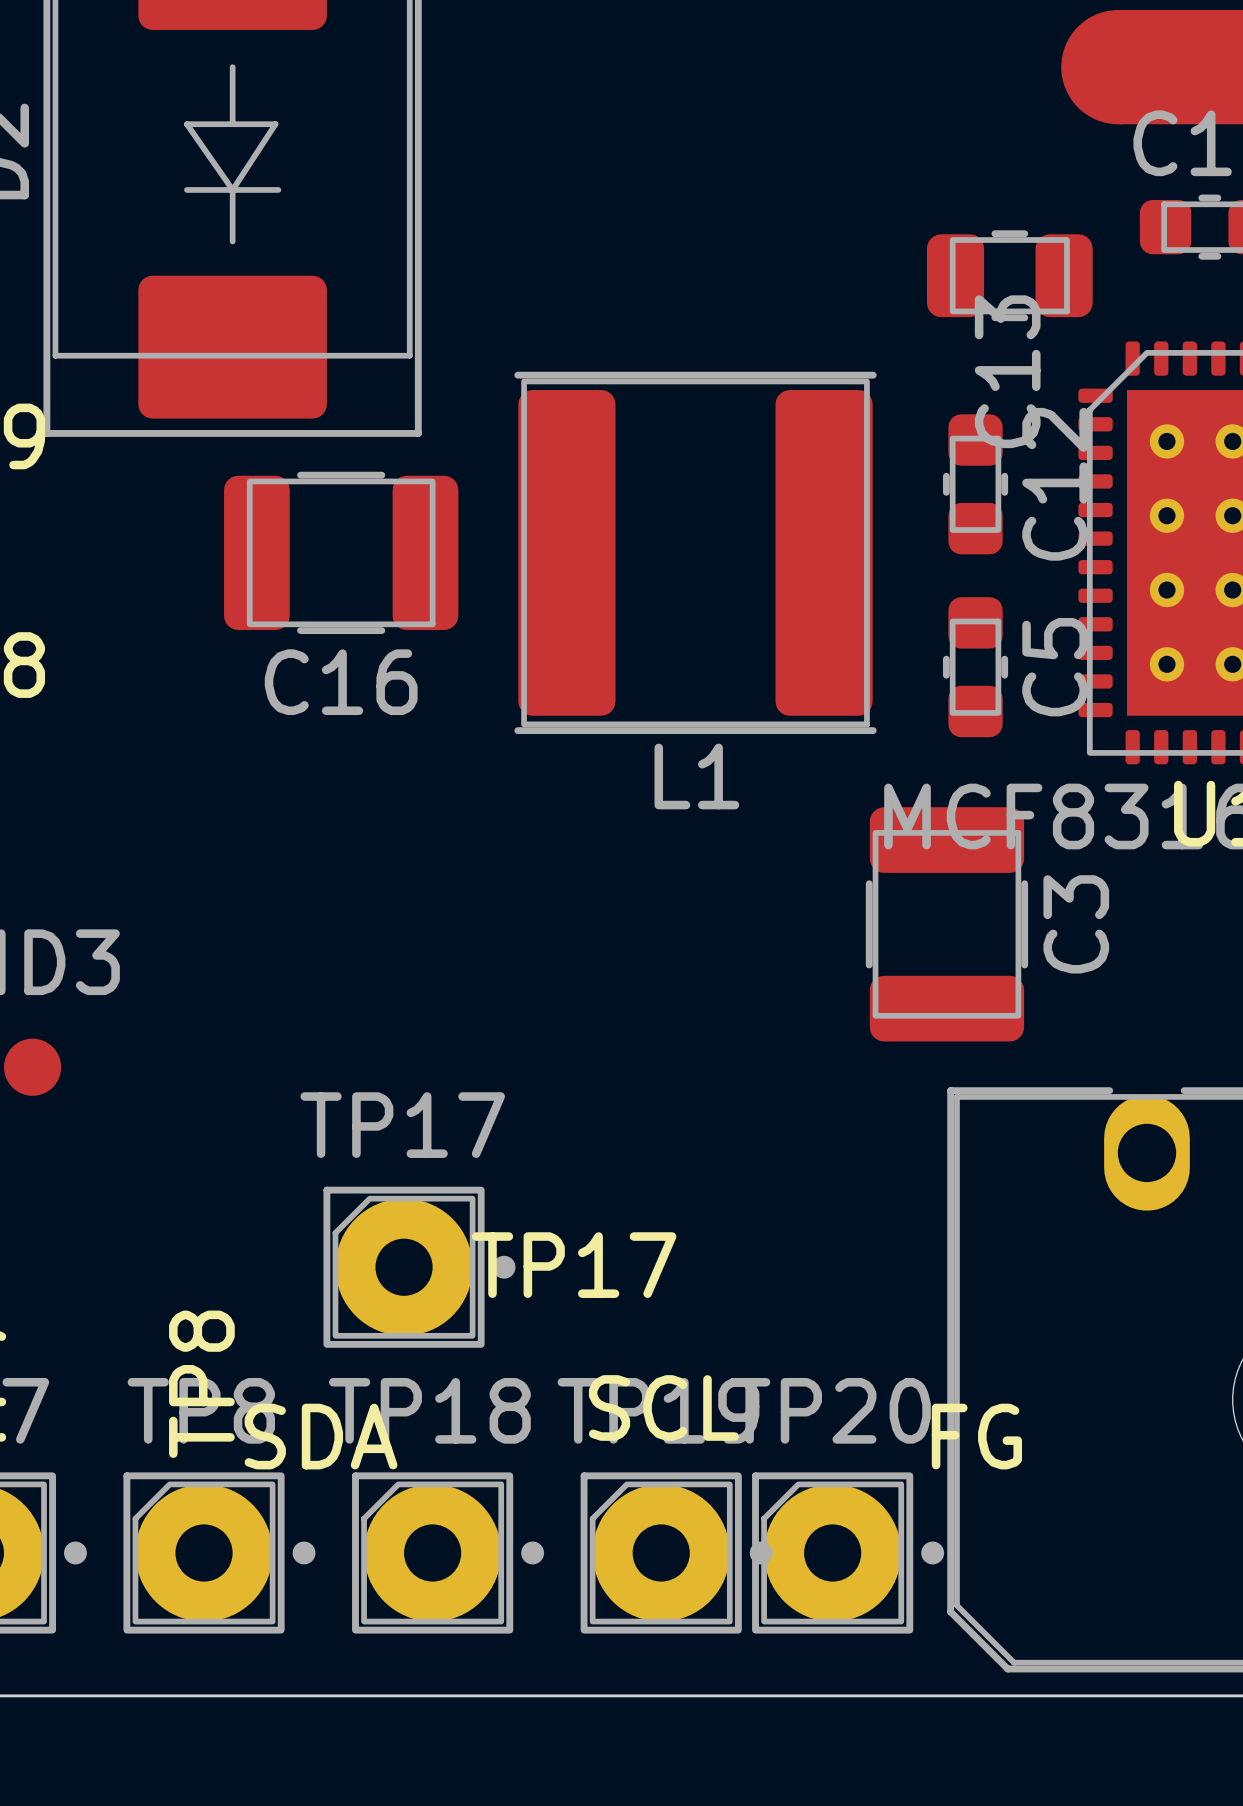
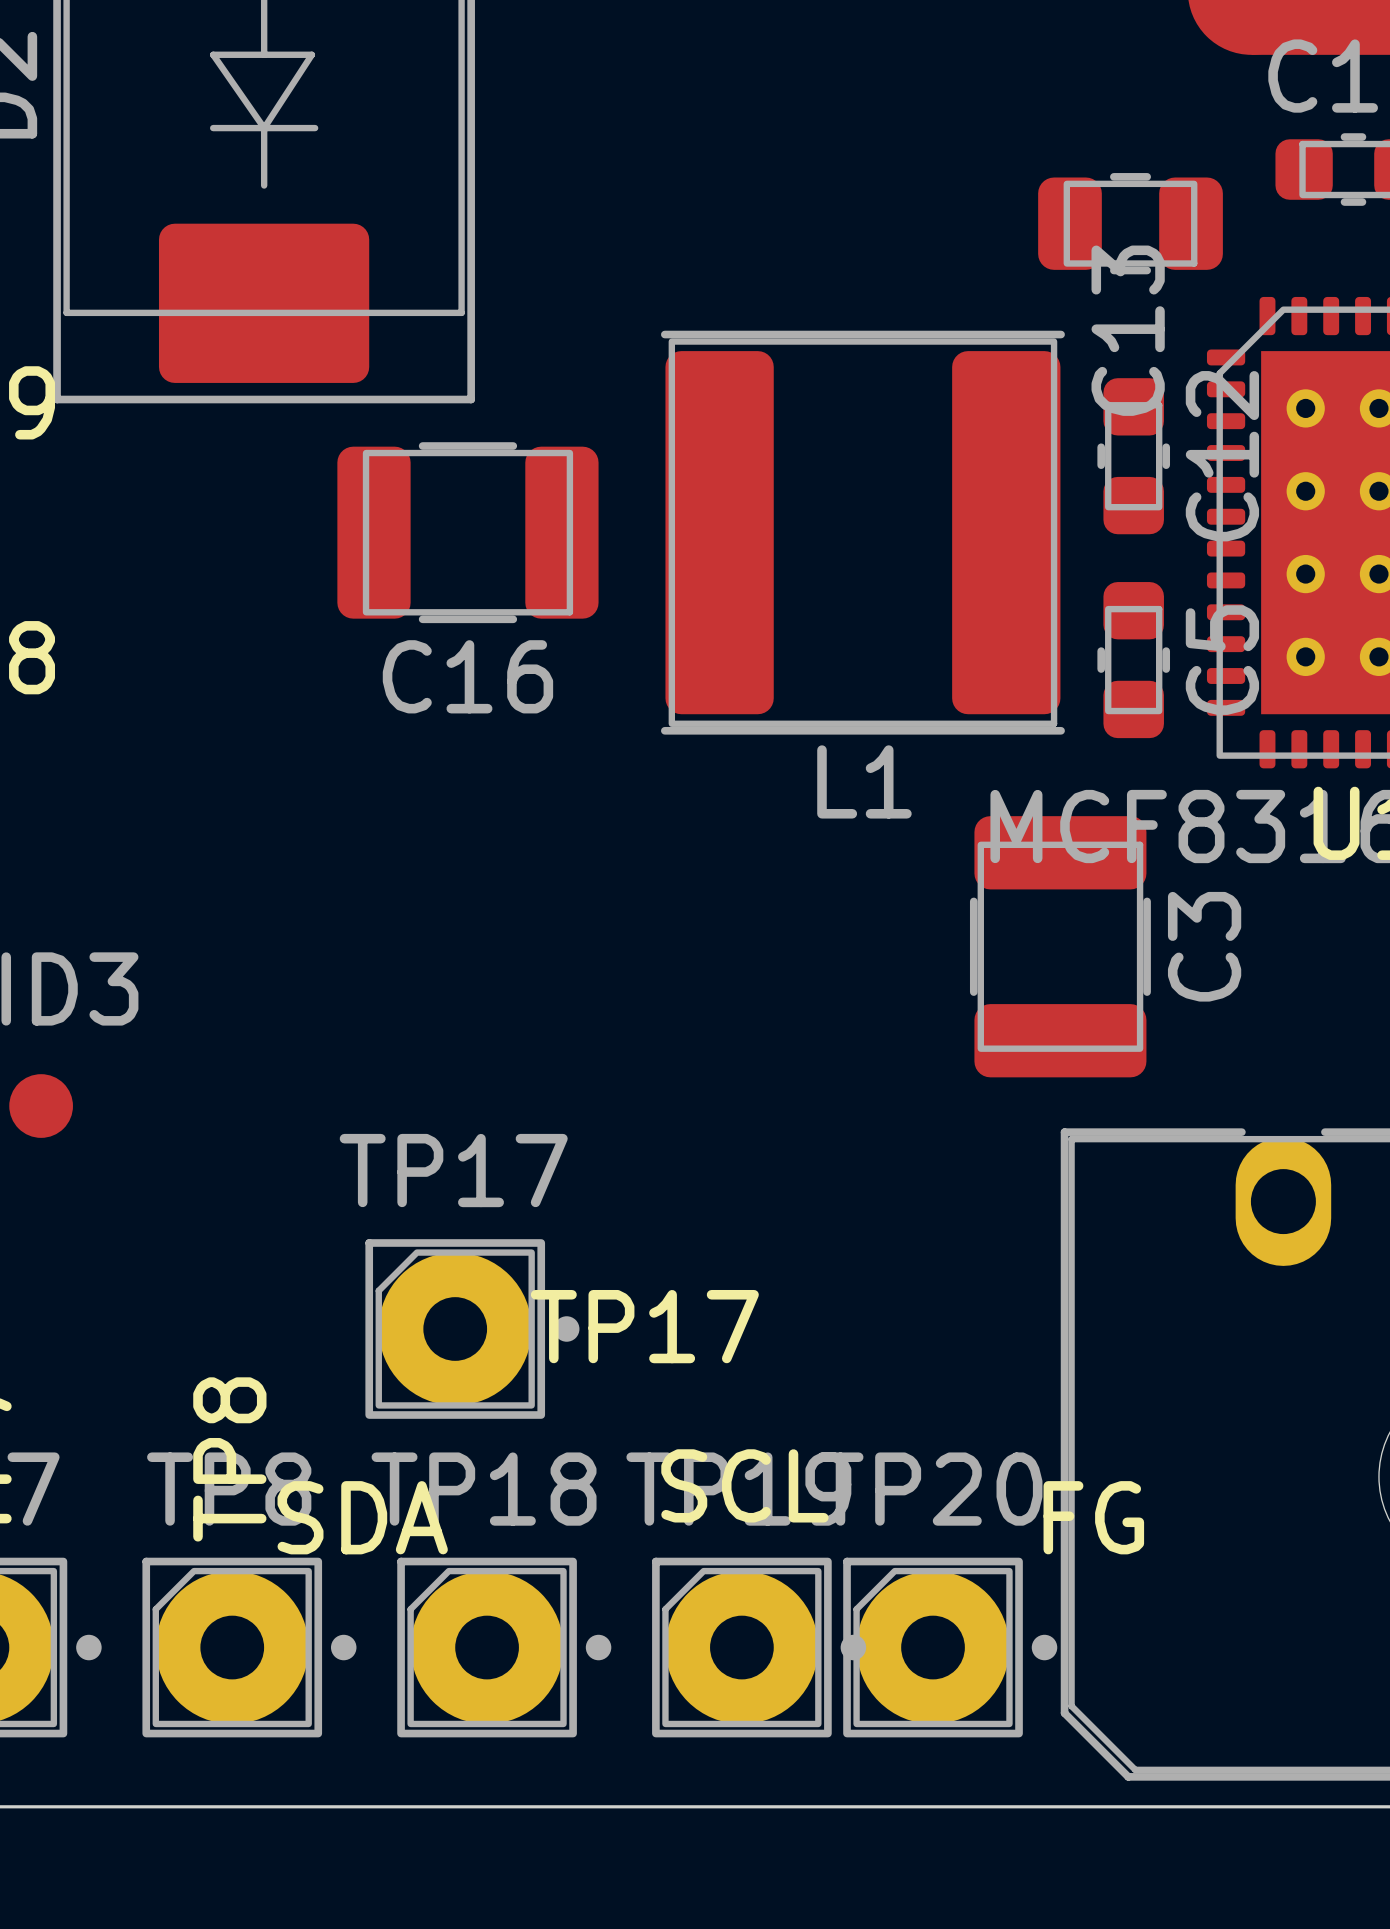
C12 position: (975, 484) -> (1133, 456)
C16 position: (341, 552) -> (467, 532)
L1 position: (695, 552) -> (862, 532)
C5 position: (975, 667) -> (1133, 660)

